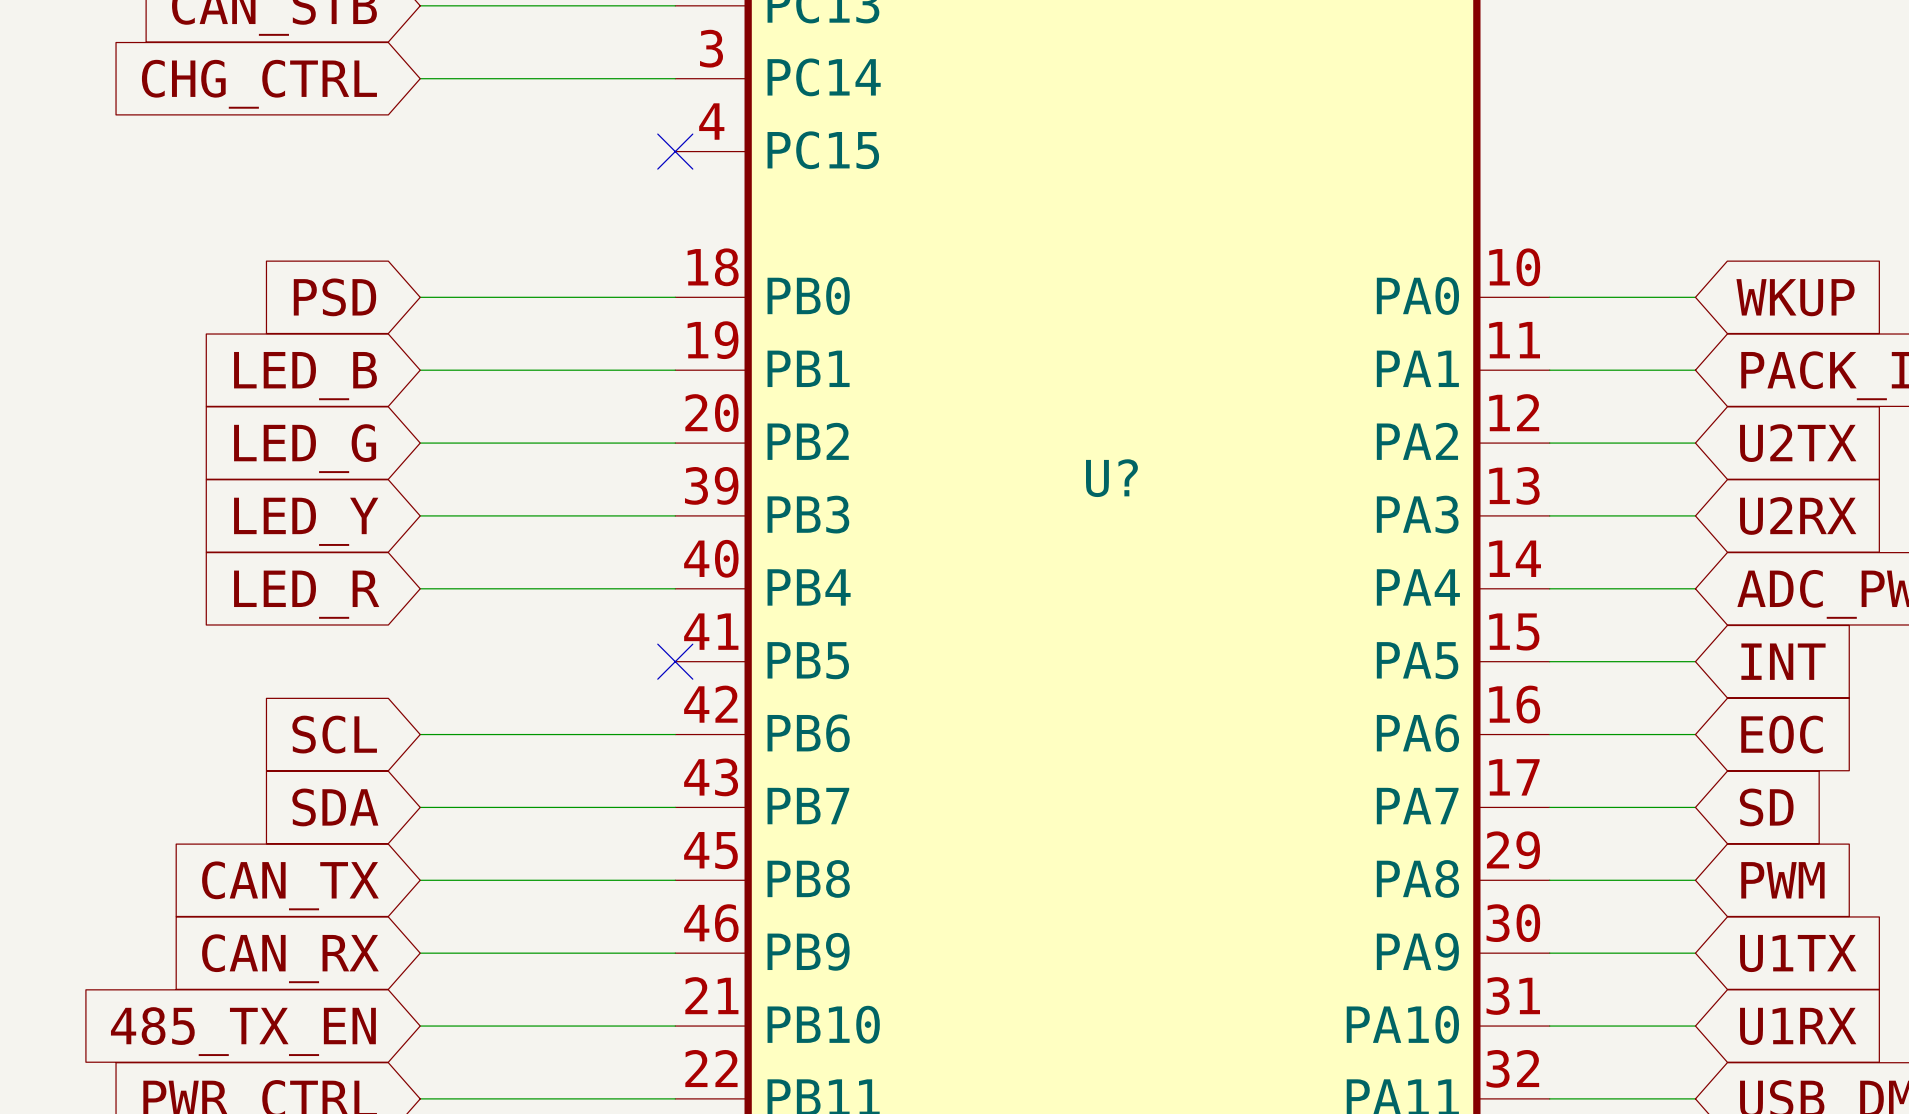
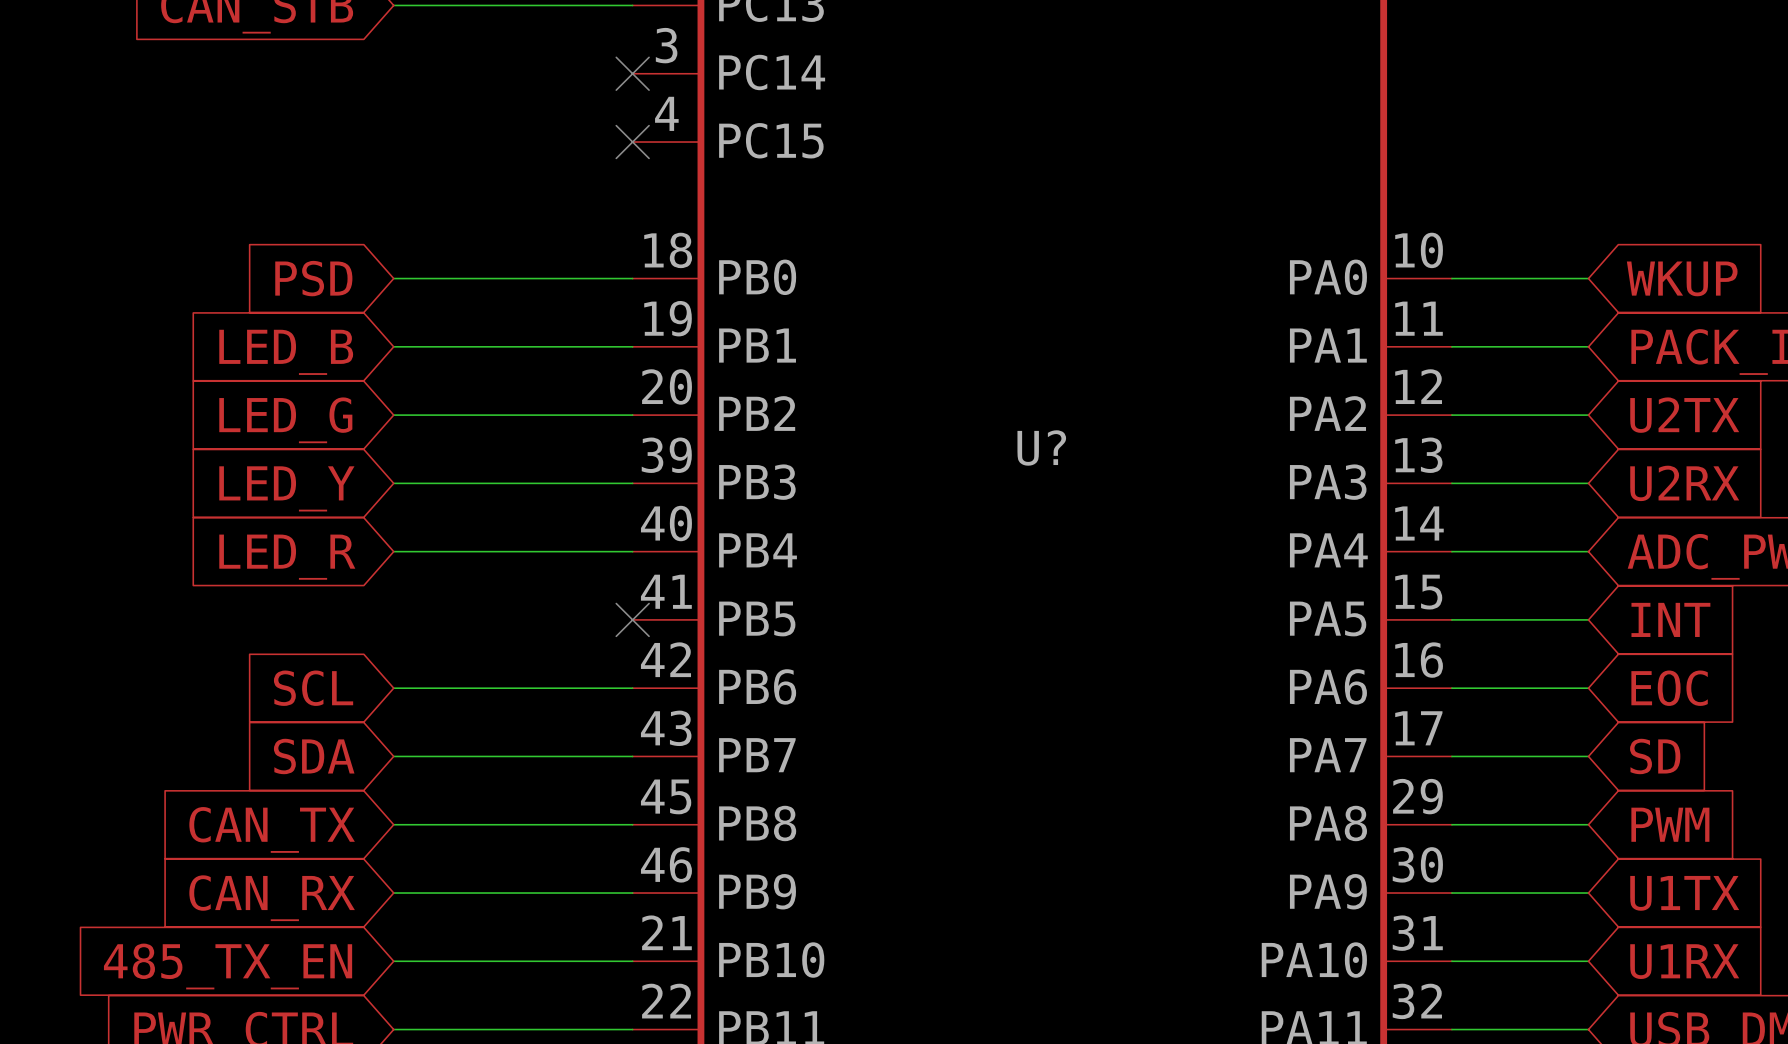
wire: (420, 78) (675, 78) -> none
no-connect mark: none -> (632, 73)
global label: CHG_CTRL (259, 84) -> none

